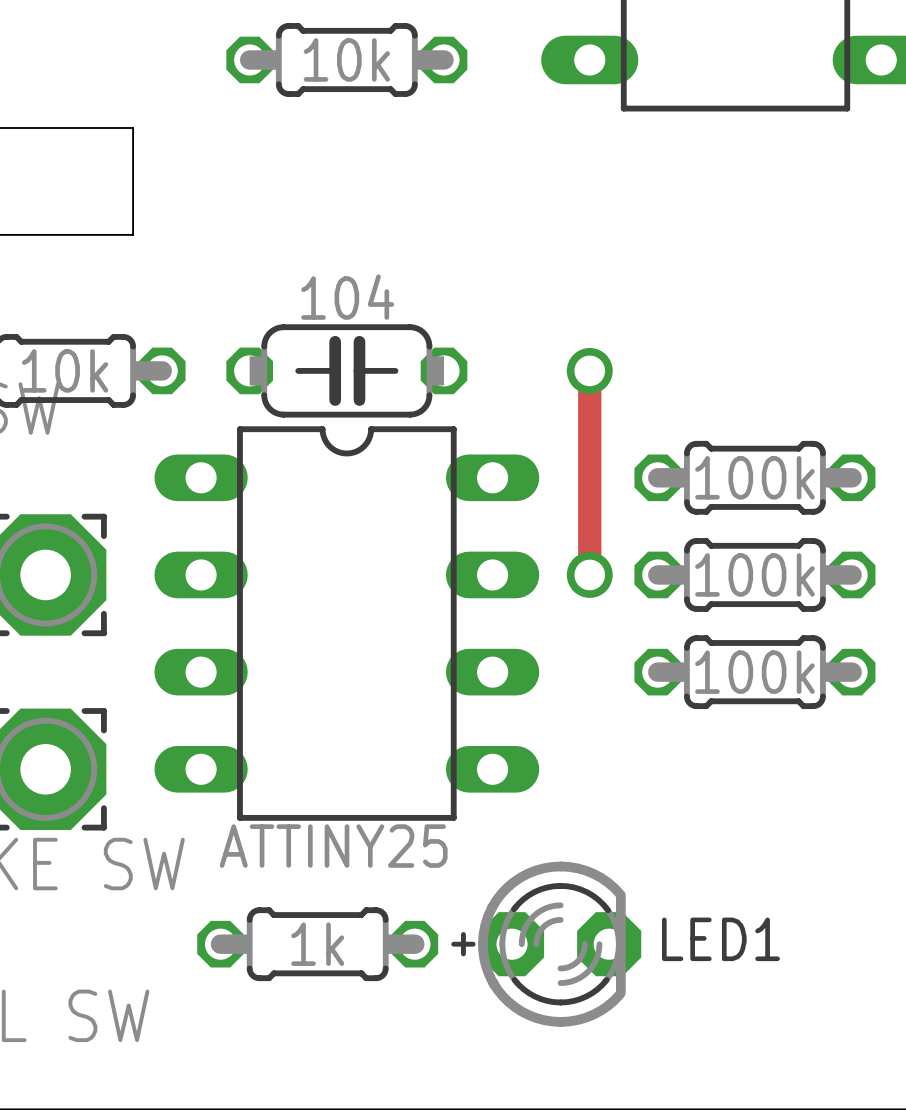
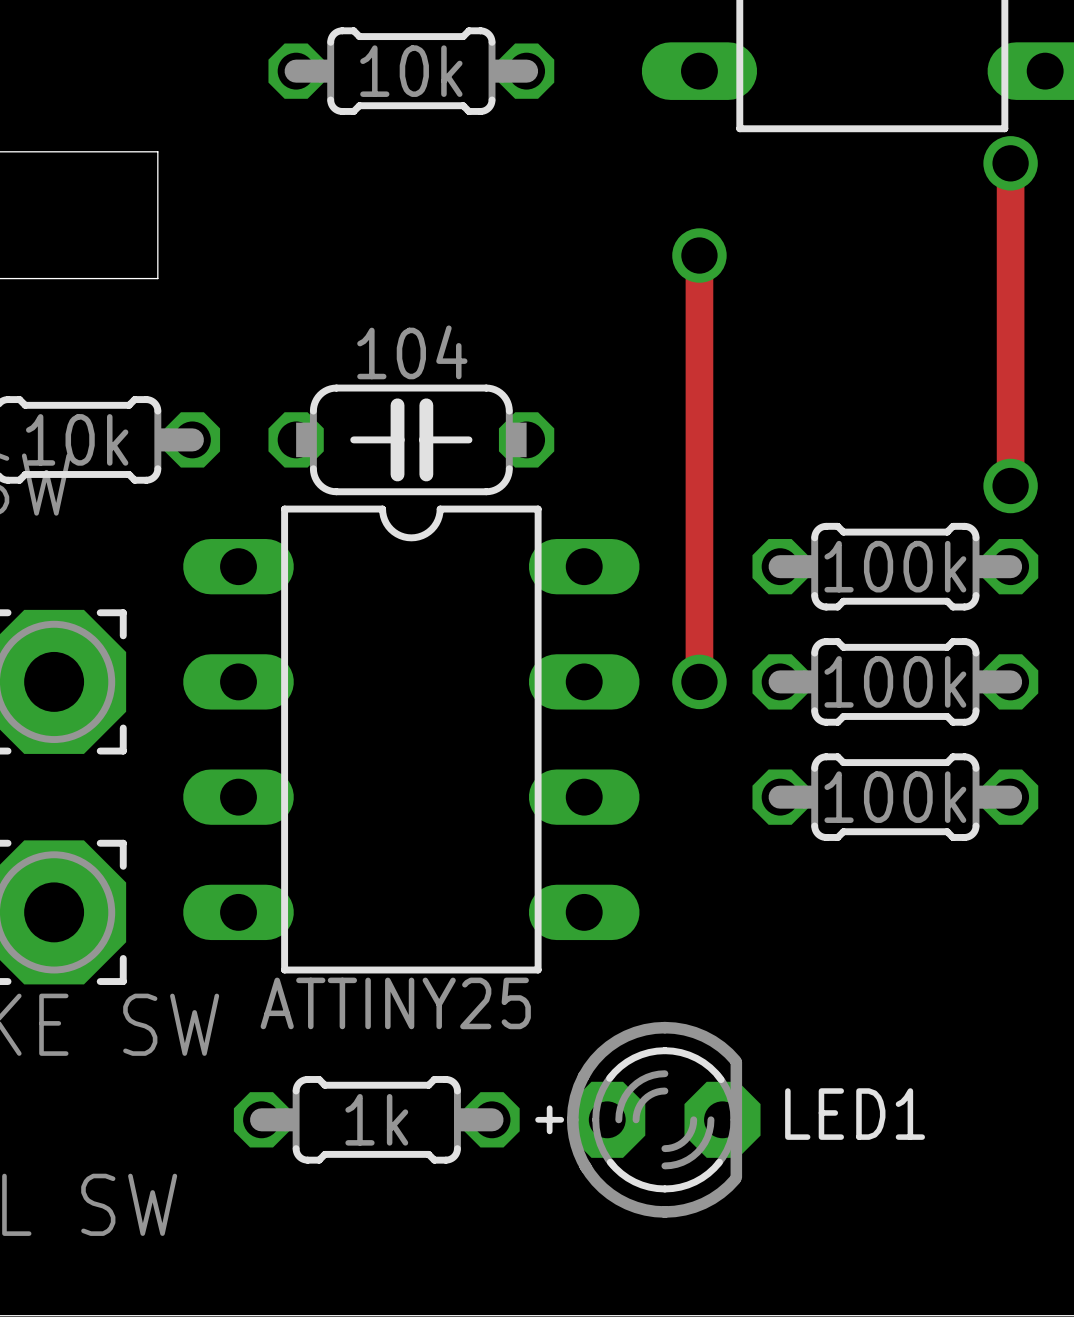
track: none -> (1010, 163) (1010, 486)
via: none -> (1010, 163)
track: none -> (699, 255) (699, 439)
via: none -> (699, 255)
via: (589, 370) -> none
via: none -> (1010, 486)

